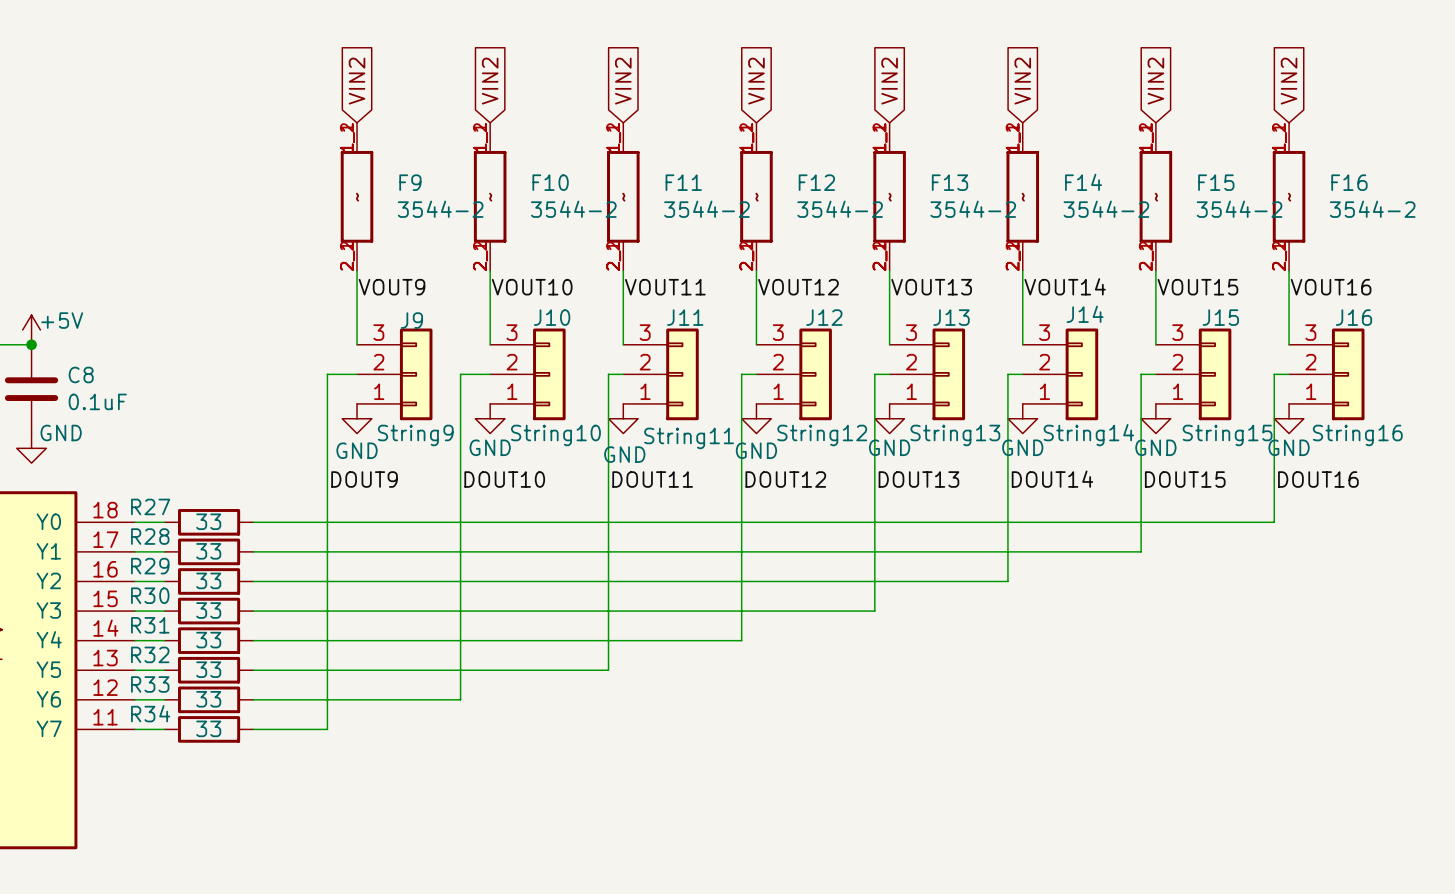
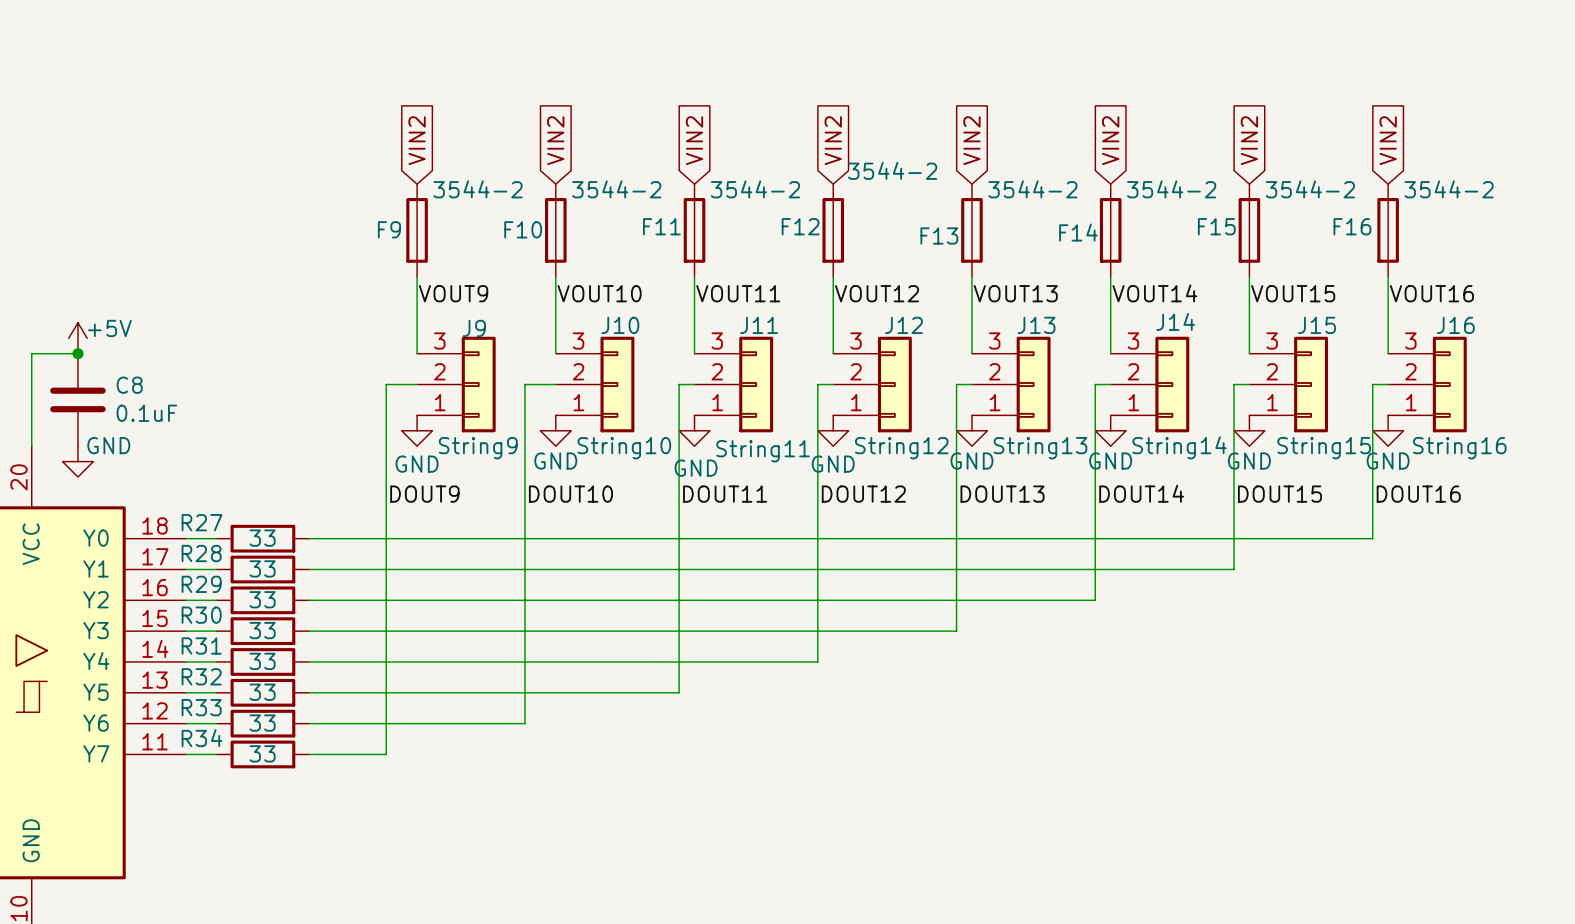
global label position: VIN2 (357, 81) -> VIN2 (417, 140)
global label position: VIN2 (490, 81) -> VIN2 (555, 140)
global label position: VIN2 (623, 81) -> VIN2 (694, 140)
global label position: VIN2 (756, 81) -> VIN2 (833, 140)
global label position: VIN2 (889, 81) -> VIN2 (971, 140)
global label position: VIN2 (1022, 81) -> VIN2 (1110, 140)
global label position: VIN2 (1155, 81) -> VIN2 (1249, 140)
global label position: VIN2 (1289, 81) -> VIN2 (1388, 140)
F9 symbol: [340, 122, 374, 271] -> [406, 184, 428, 277]
F10 symbol: [473, 122, 507, 271] -> [545, 184, 567, 277]
F11 symbol: [607, 122, 640, 271] -> [683, 184, 706, 277]
F12 symbol: [740, 122, 773, 271] -> [822, 184, 845, 277]
F13 symbol: [873, 122, 906, 271] -> [961, 184, 983, 277]
F14 symbol: [1006, 122, 1040, 271] -> [1099, 184, 1122, 277]
F15 symbol: [1139, 122, 1173, 271] -> [1238, 184, 1261, 277]
F16 symbol: [1272, 122, 1306, 271] -> [1377, 184, 1399, 277]
F9 name position: F9 (410, 182) -> F9 (389, 229)
F10 name position: F10 (550, 182) -> F10 (523, 229)
F11 name position: F11 (683, 182) -> F11 (661, 226)
F12 name position: F12 (816, 182) -> F12 (800, 226)
F13 name position: F13 (950, 182) -> F13 (939, 235)
F14 name position: F14 (1083, 182) -> F14 (1078, 232)
F15 name position: F15 (1216, 182) -> F15 (1216, 226)
F16 name position: F16 (1349, 182) -> F16 (1352, 226)
F9 value position: 3544-2 (440, 209) -> 3544-2 (478, 189)
F10 value position: 3544-2 (573, 209) -> 3544-2 (616, 189)
F11 value position: 3544-2 (706, 209) -> 3544-2 (755, 189)
F12 value position: 3544-2 (840, 209) -> 3544-2 (892, 170)
F13 value position: 3544-2 (973, 209) -> 3544-2 (1032, 189)
F14 value position: 3544-2 (1106, 209) -> 3544-2 (1171, 189)
F15 value position: 3544-2 (1239, 209) -> 3544-2 (1310, 189)
F16 value position: 3544-2 (1372, 209) -> 3544-2 (1449, 189)

